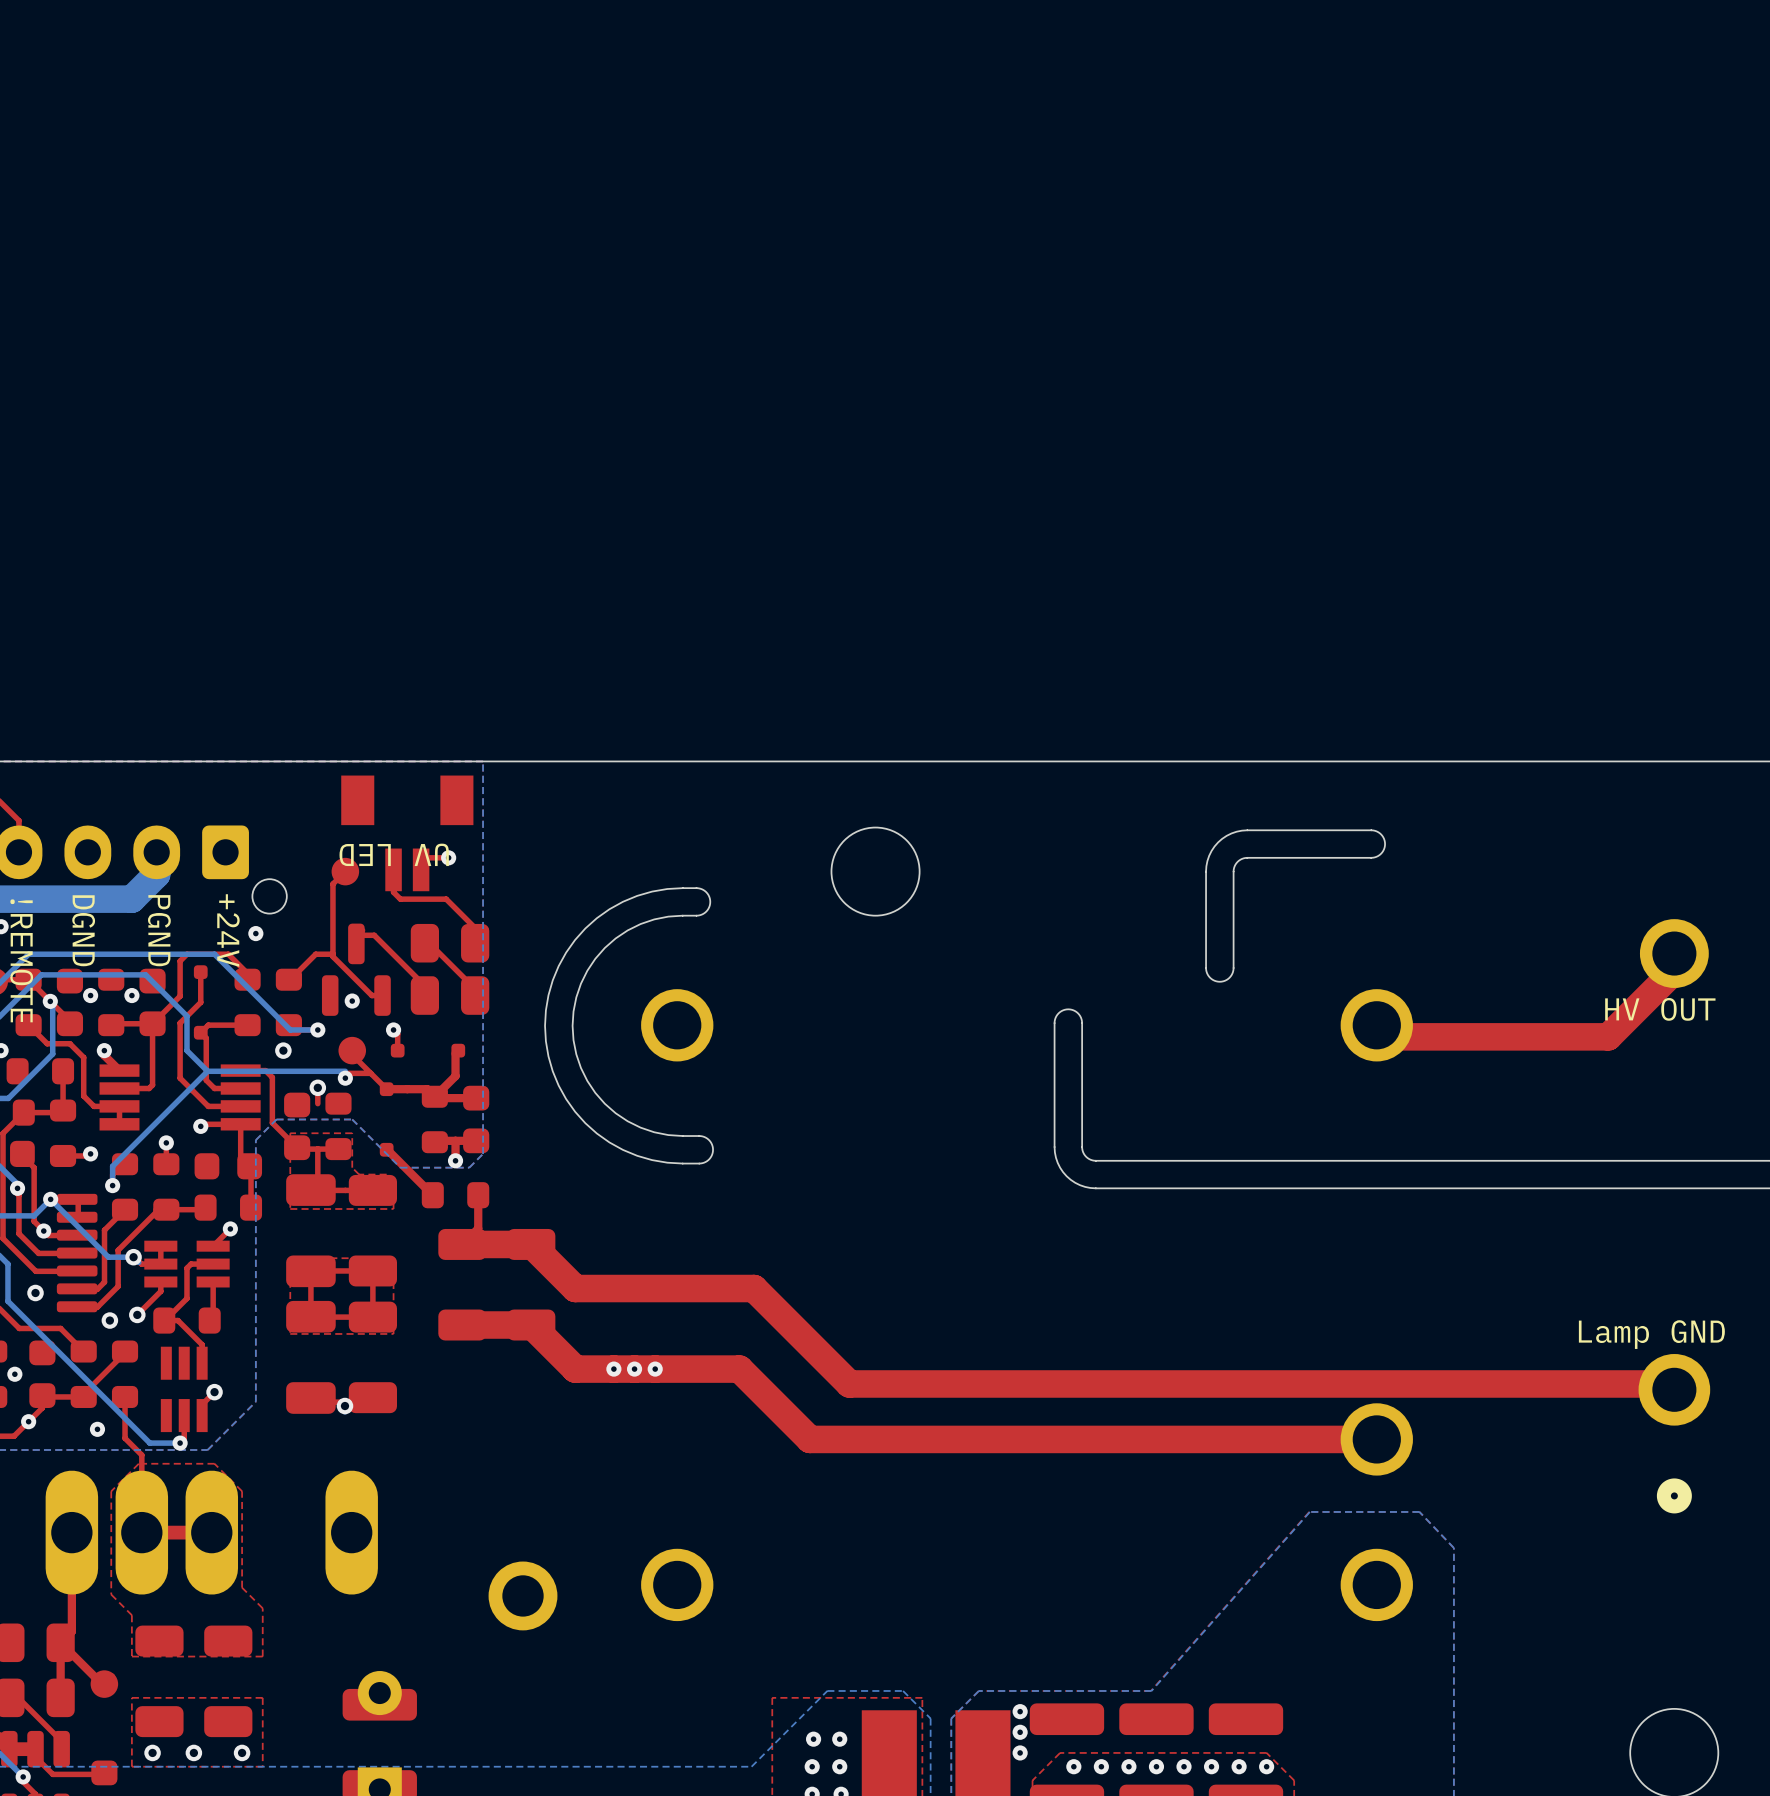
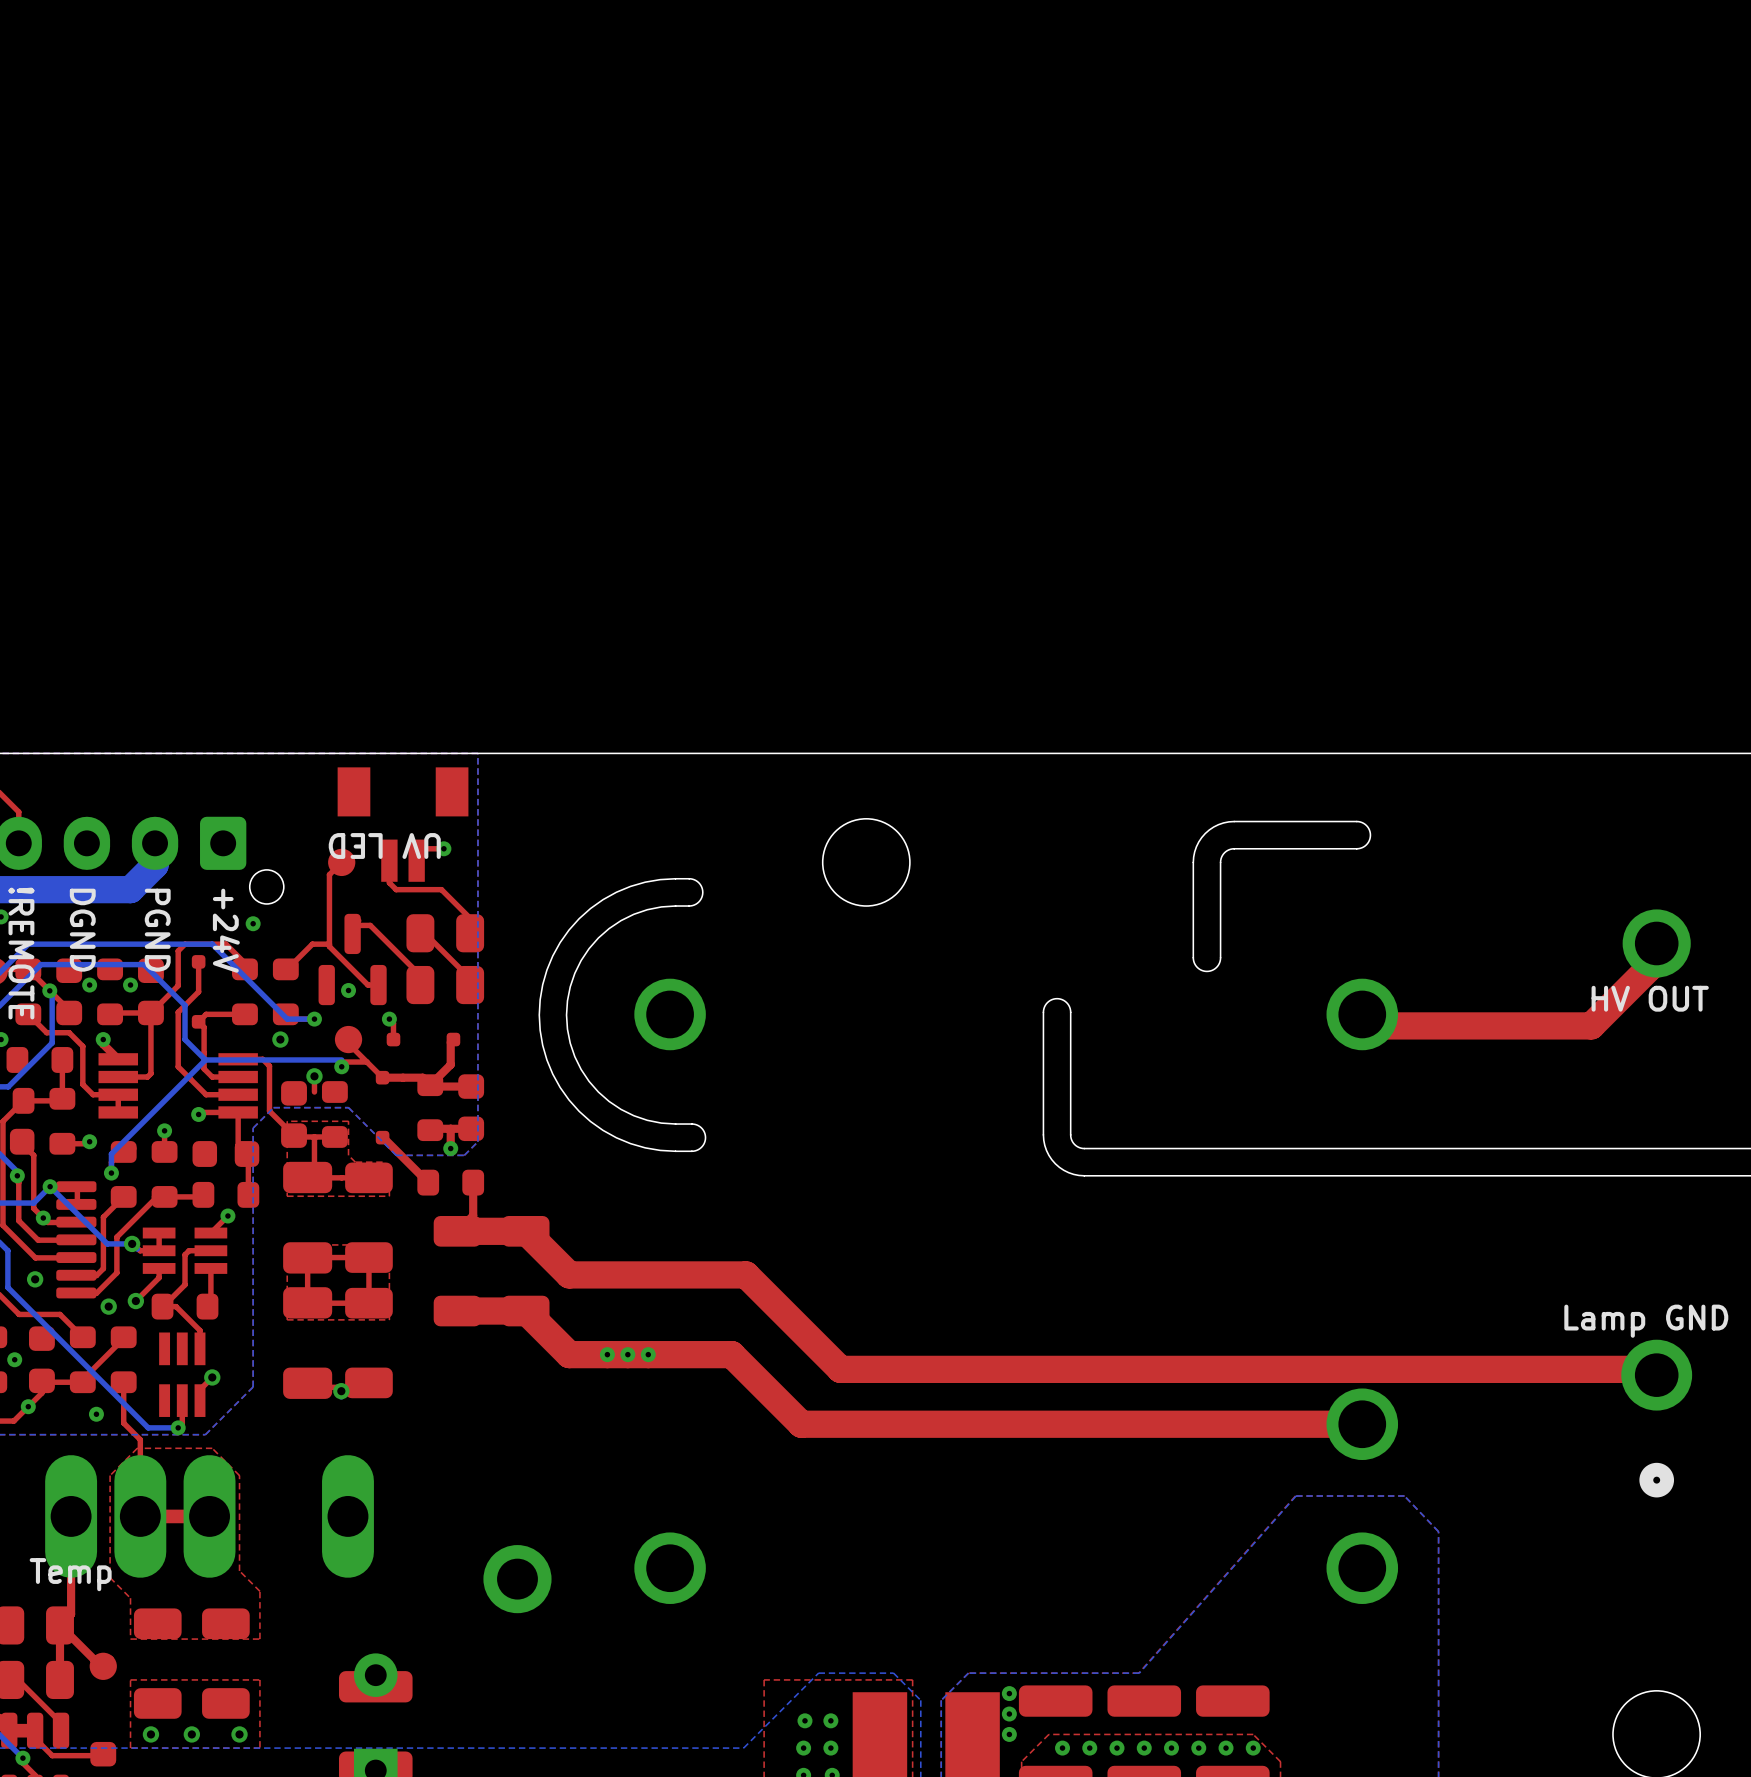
text: none -> Temp (70, 1574)

